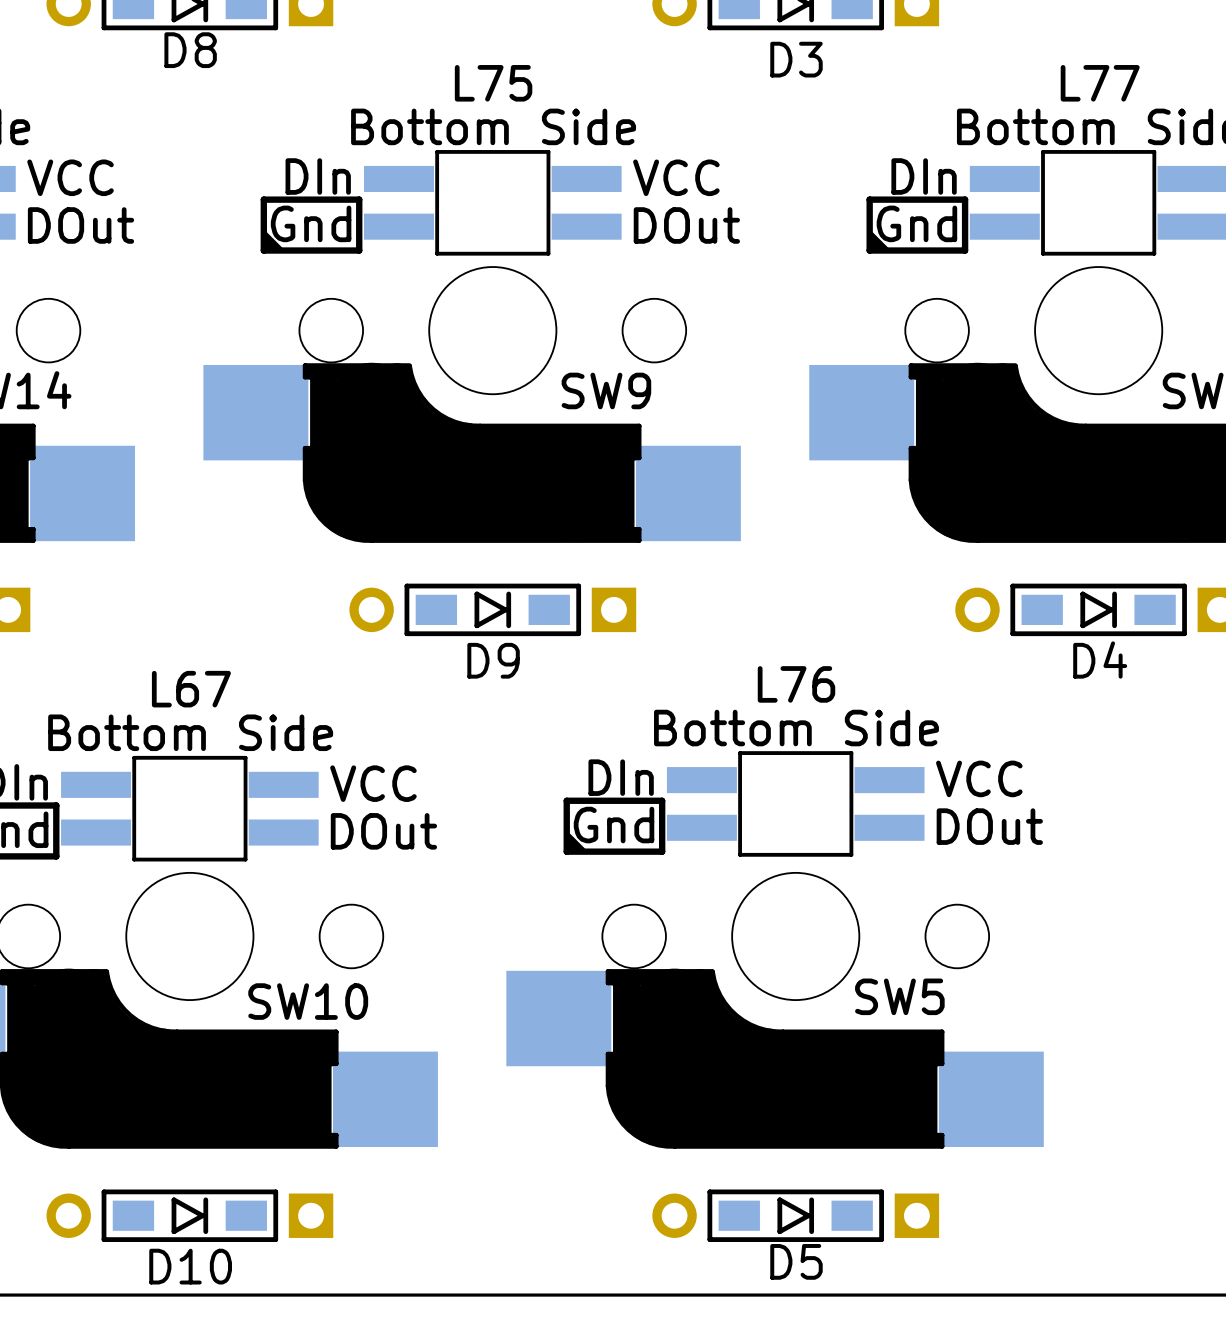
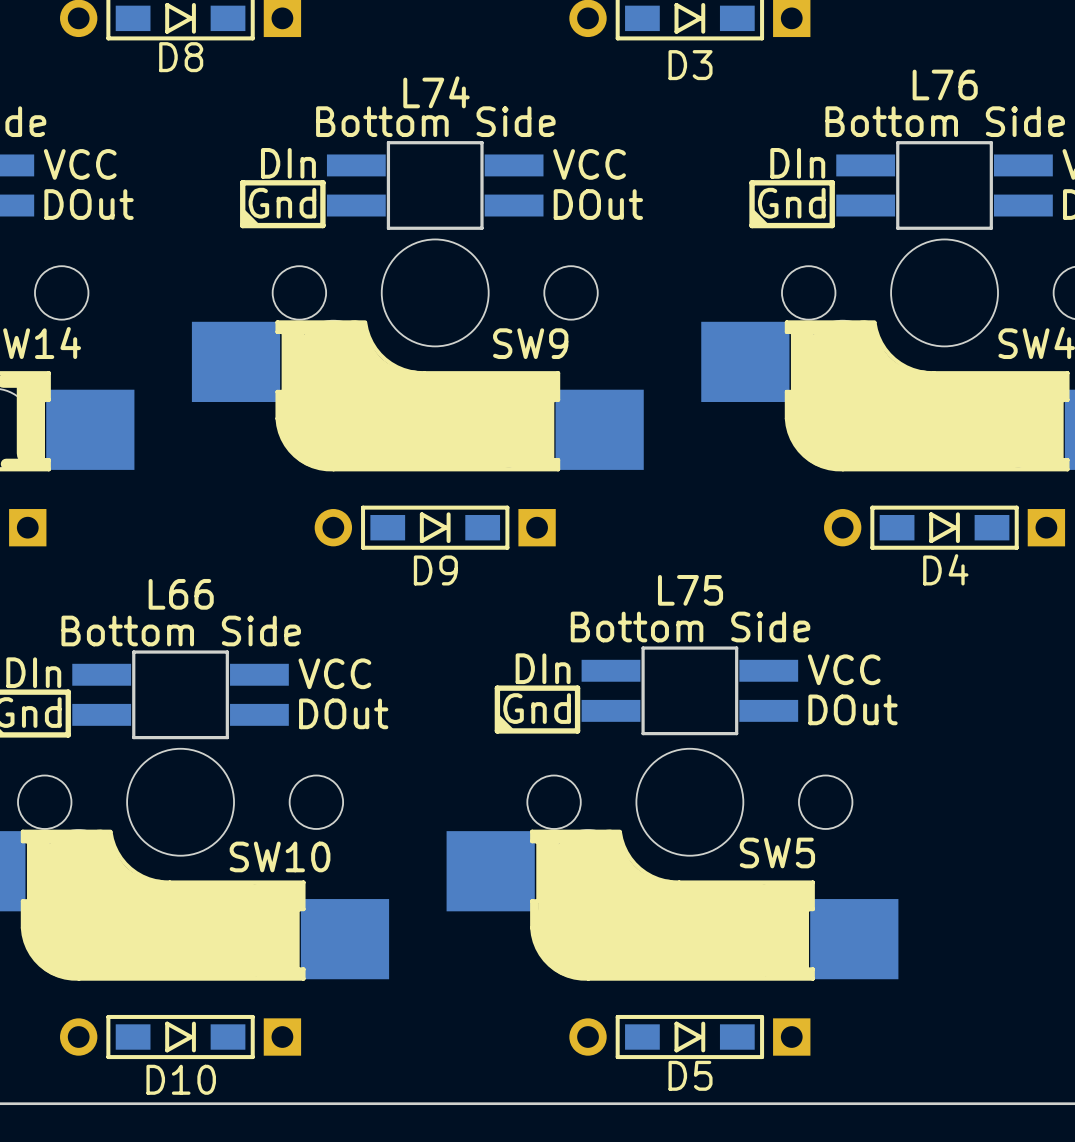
L75 name: L75 (493, 83) -> L74 (436, 92)
L77 name: L77 (1100, 83) -> L76 (945, 85)
L76 name: L76 (796, 684) -> L75 (690, 590)
L67 name: L67 (191, 689) -> L66 (181, 594)

